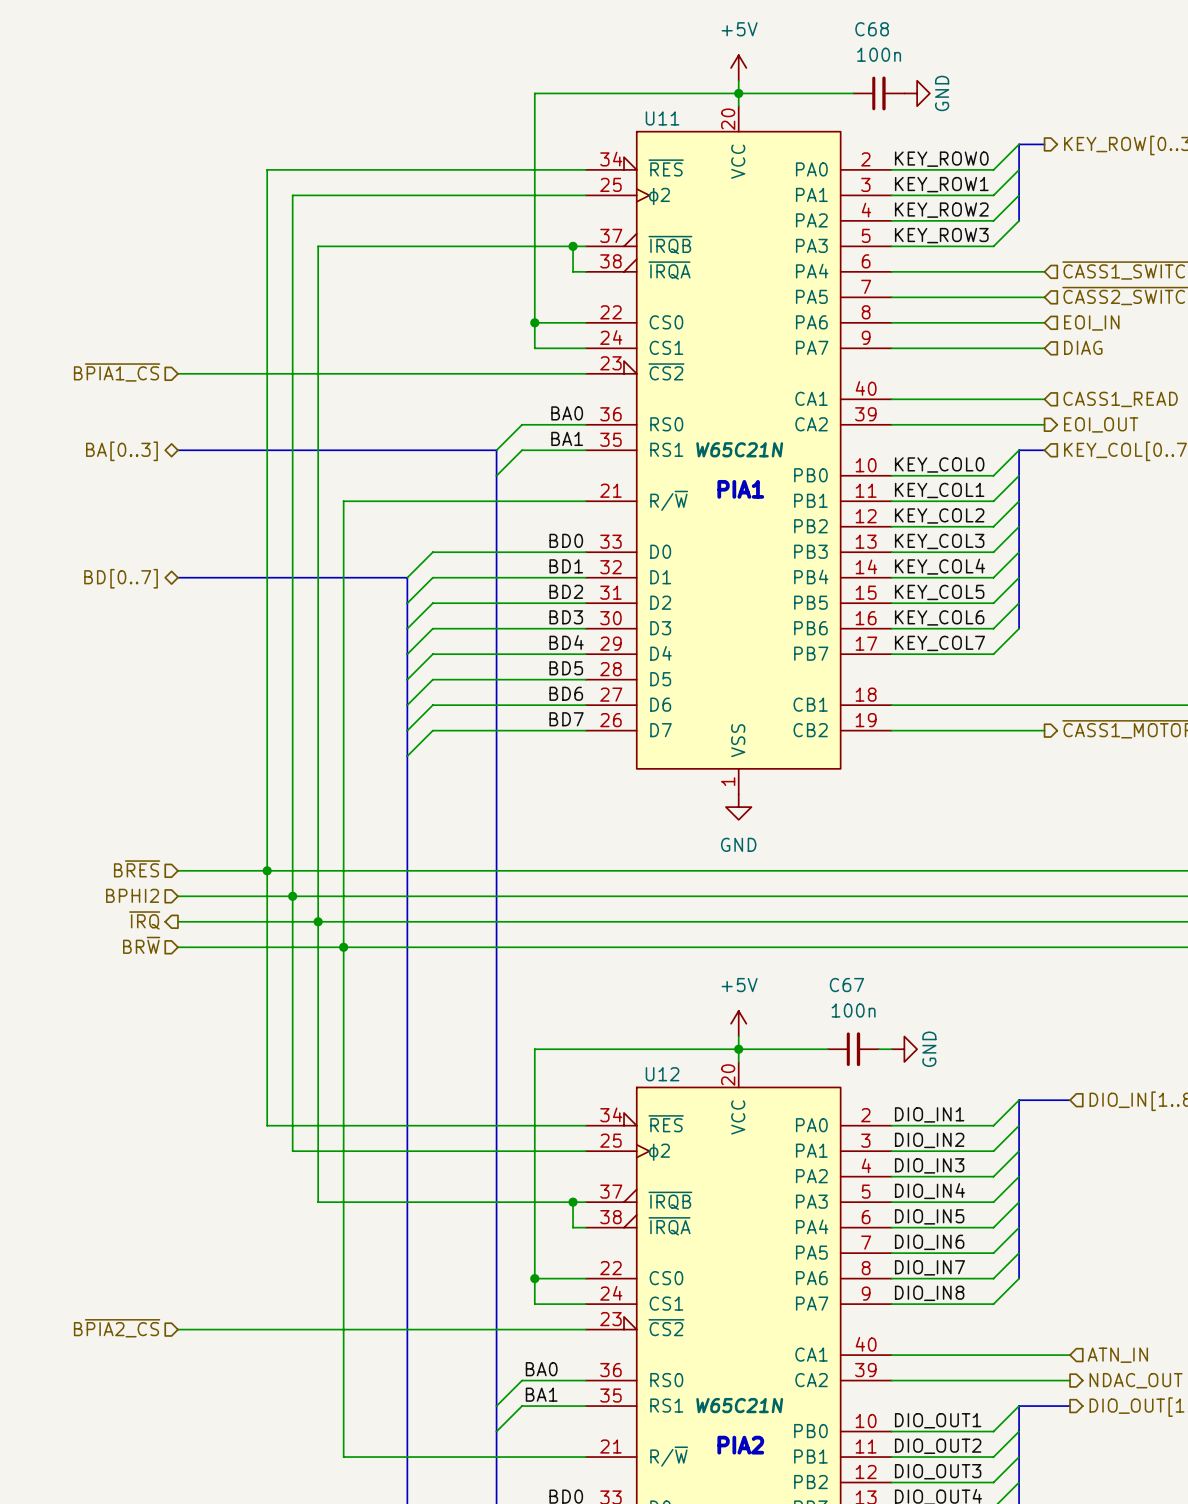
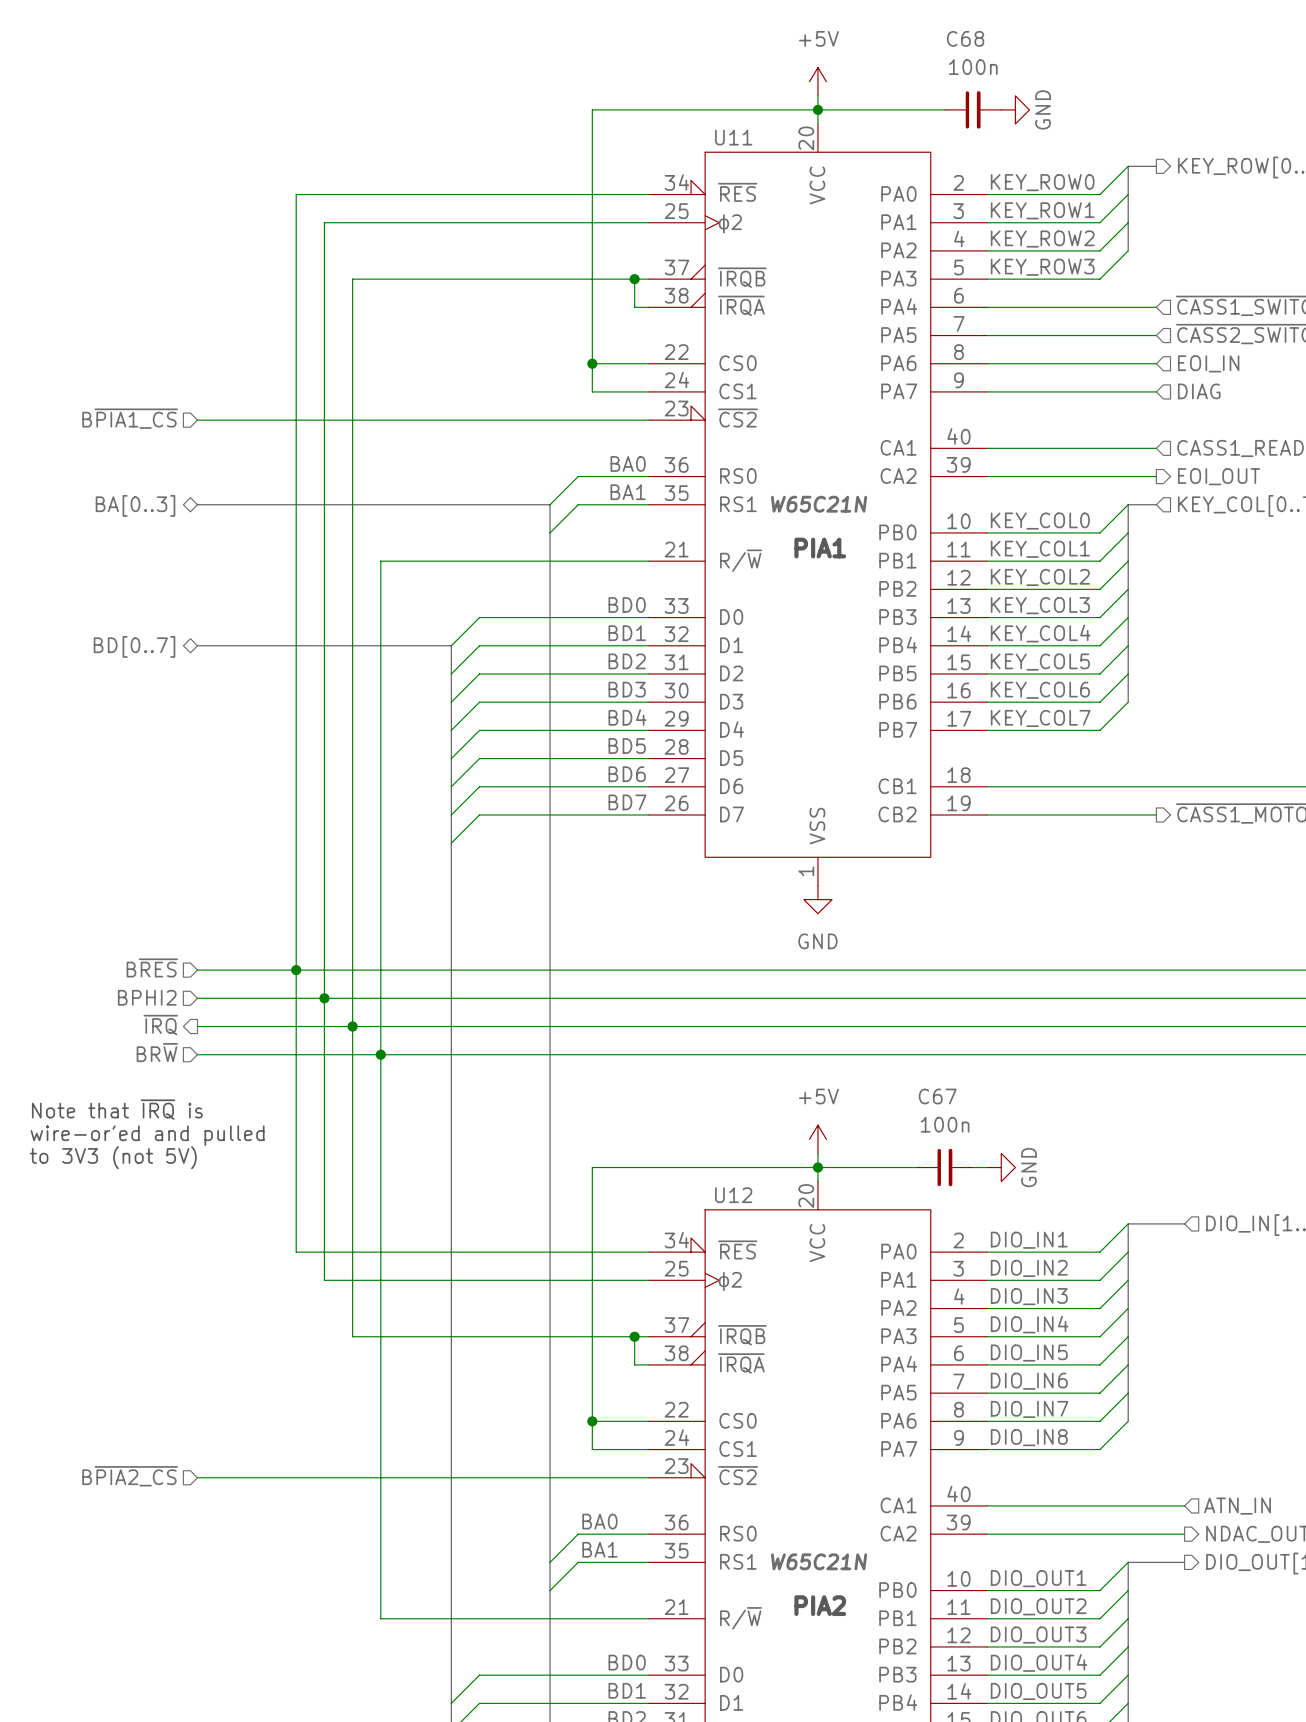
text: none -> Note that ~{IRQ} is (117, 1109)
text: none -> wire-or'ed and pulled (147, 1135)
text: none -> to 3V3 (not 5V) (113, 1157)

